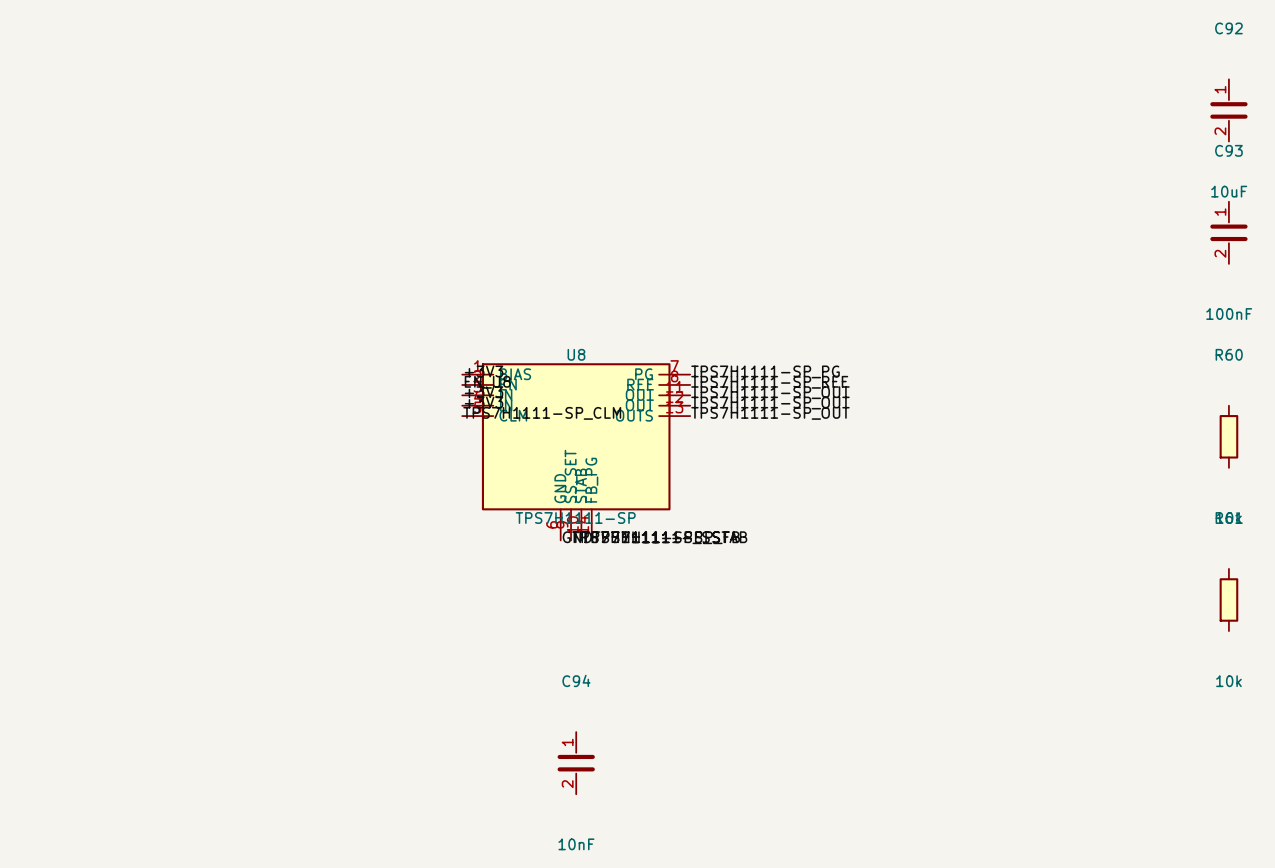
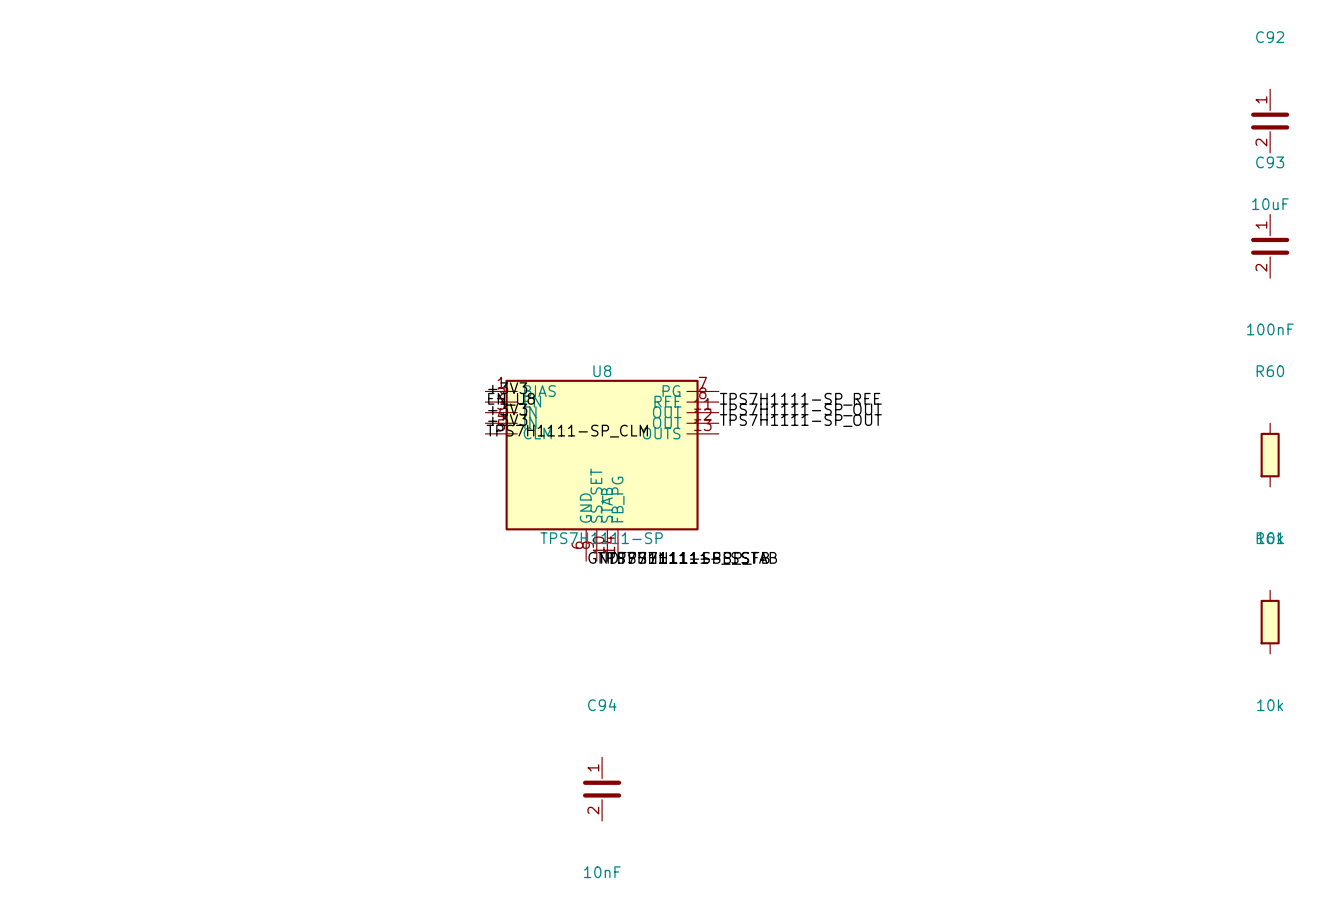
label: TPS7H1111-SP_PG (765, 371) -> none
label: TPS7H1111-SP_OUT (770, 413) -> none

